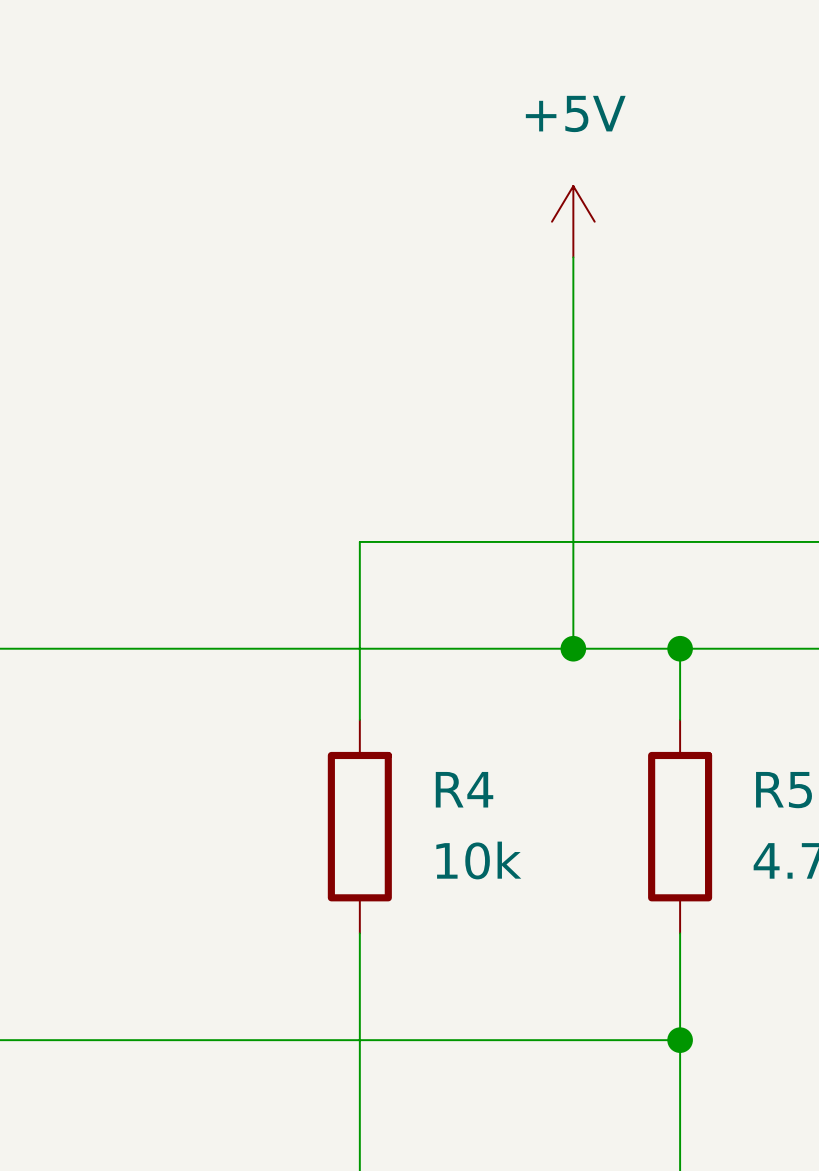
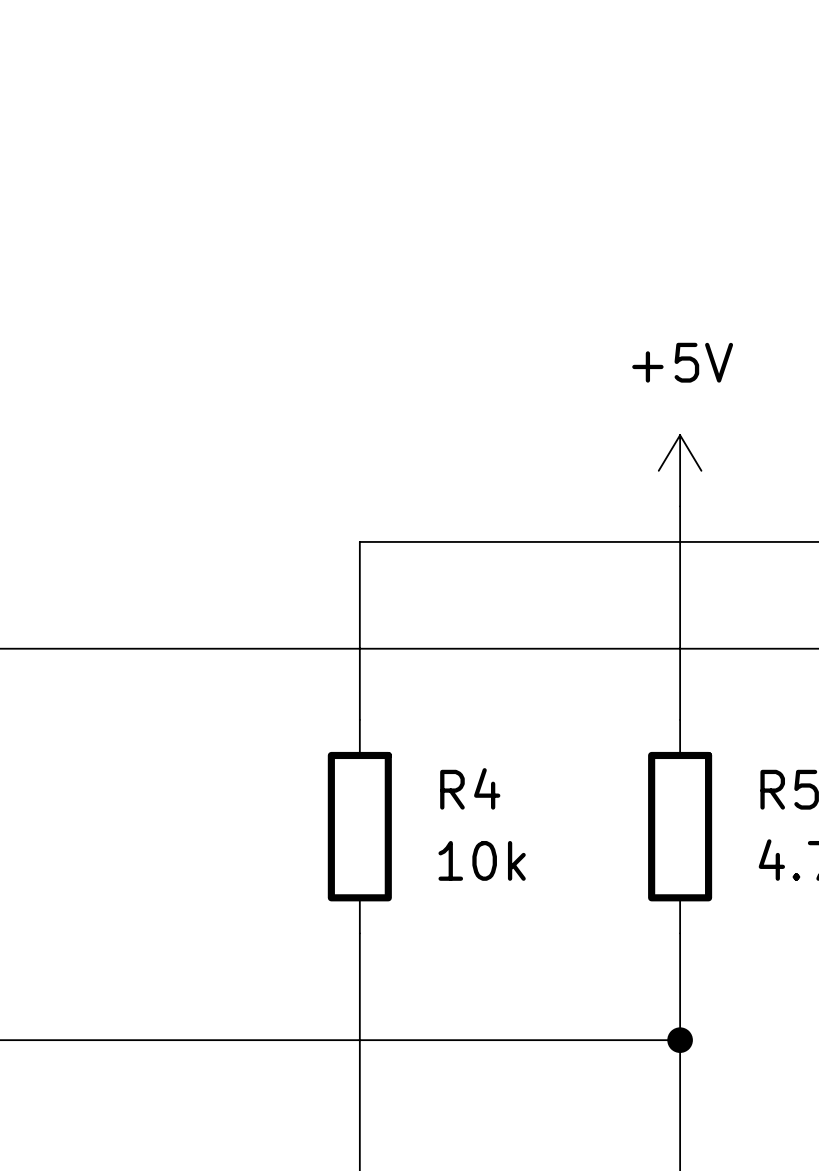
power symbol position: +5V (573, 221) -> +5V (680, 470)
wire: (573, 257) (573, 648) -> none
wire: none -> (680, 506) (680, 648)
junction: (573, 648) -> none
junction: (680, 648) -> none

